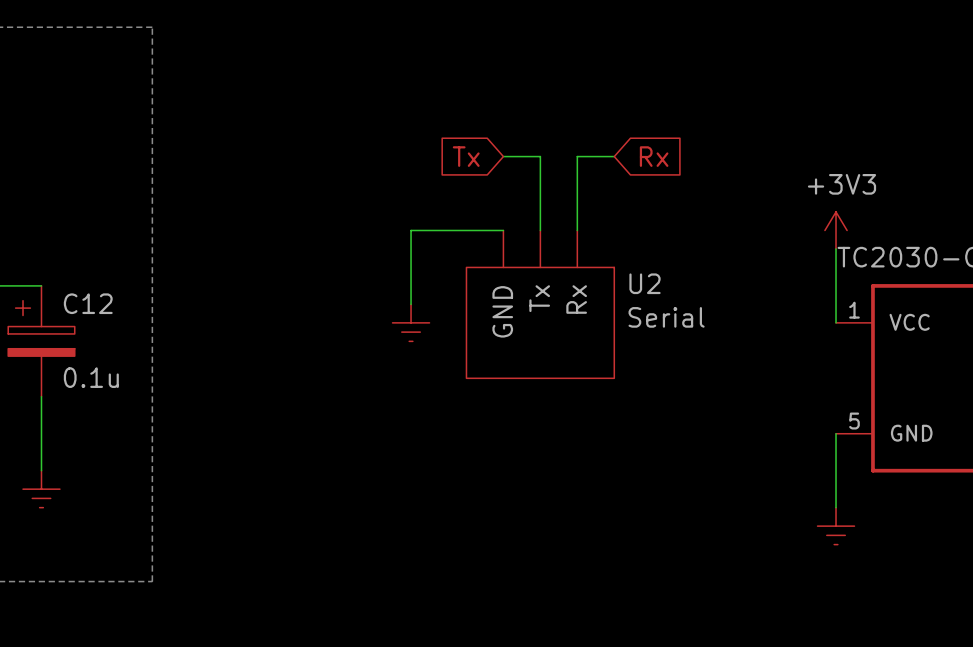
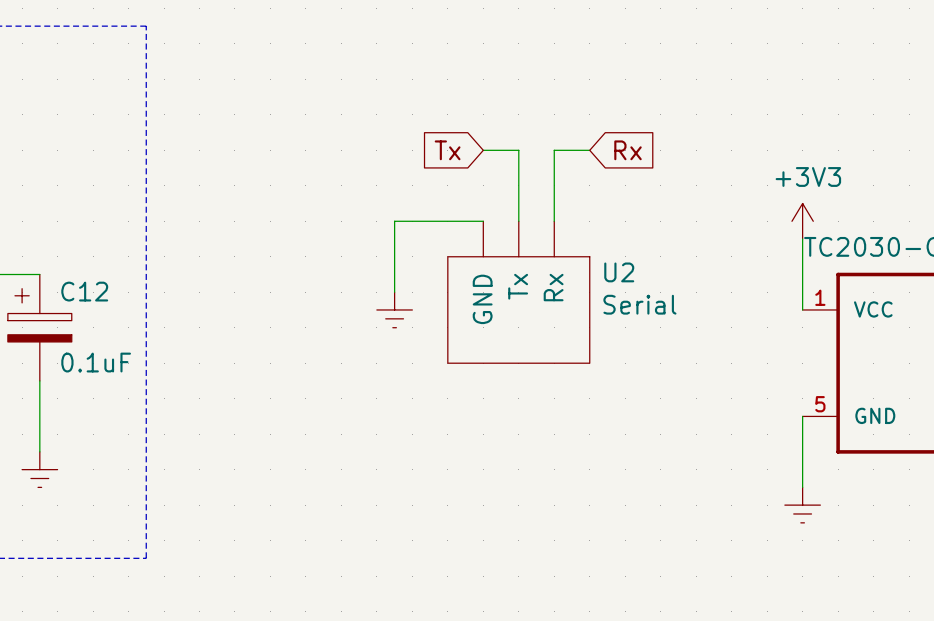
C12 value: 0.1u (91, 377) -> 0.1uF (96, 362)

